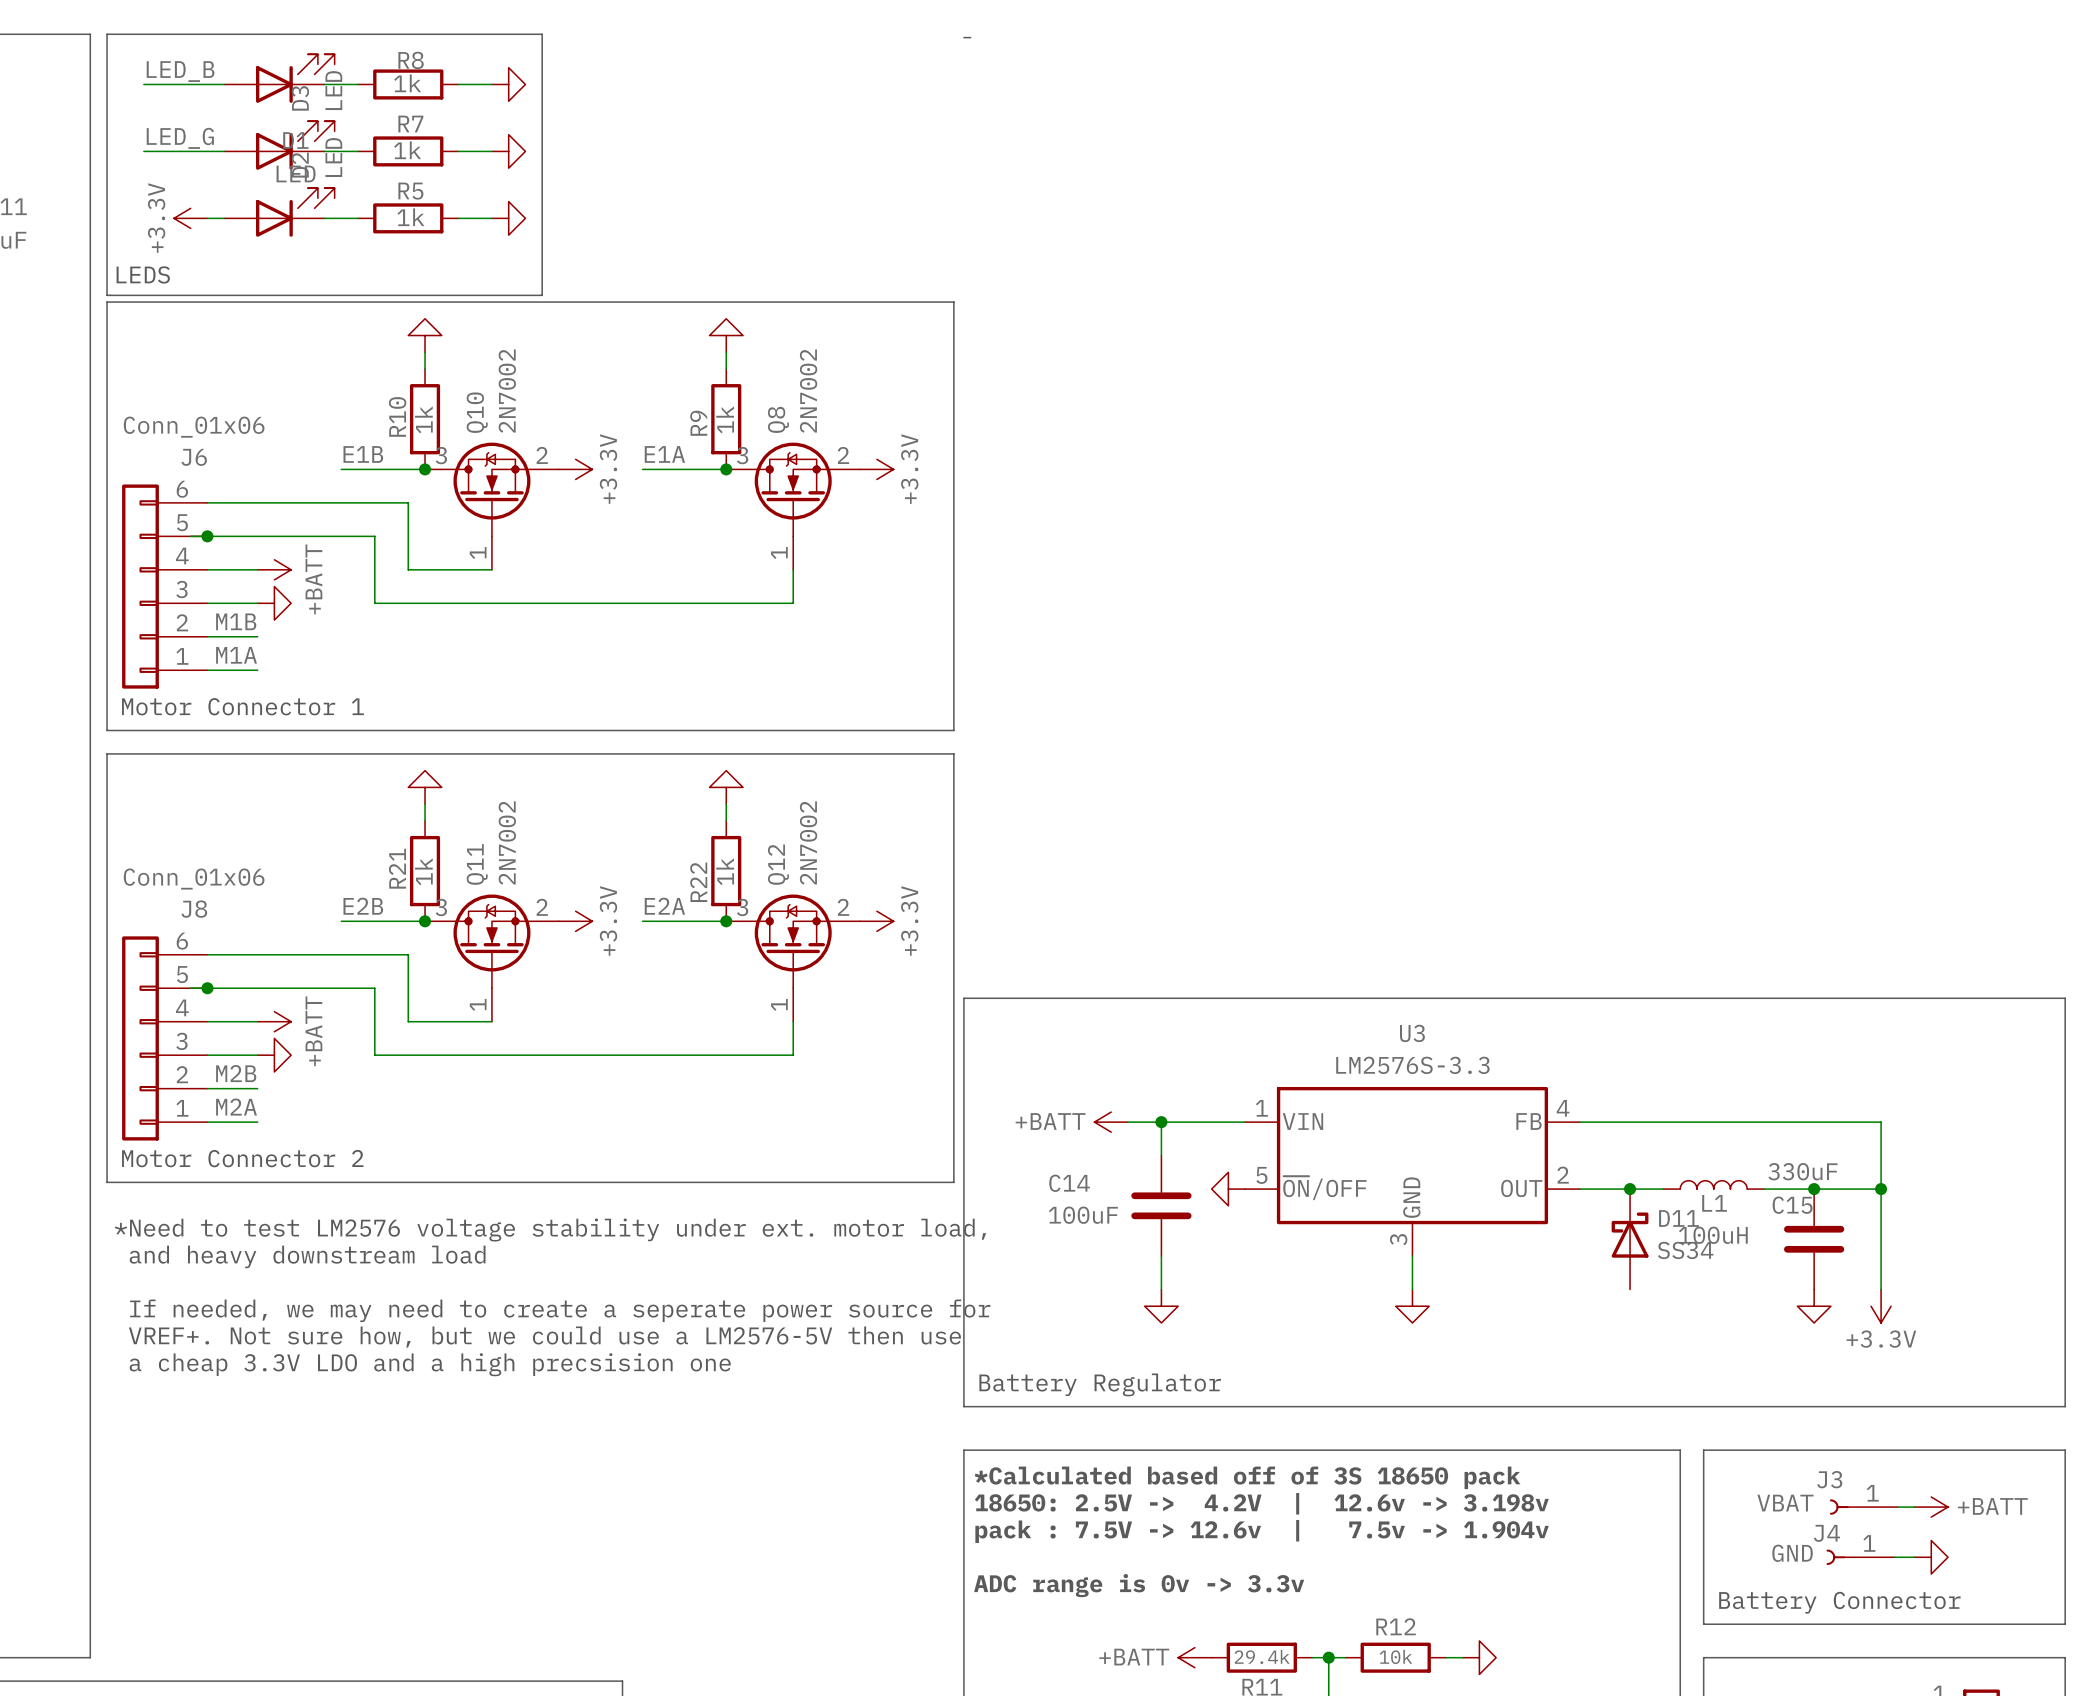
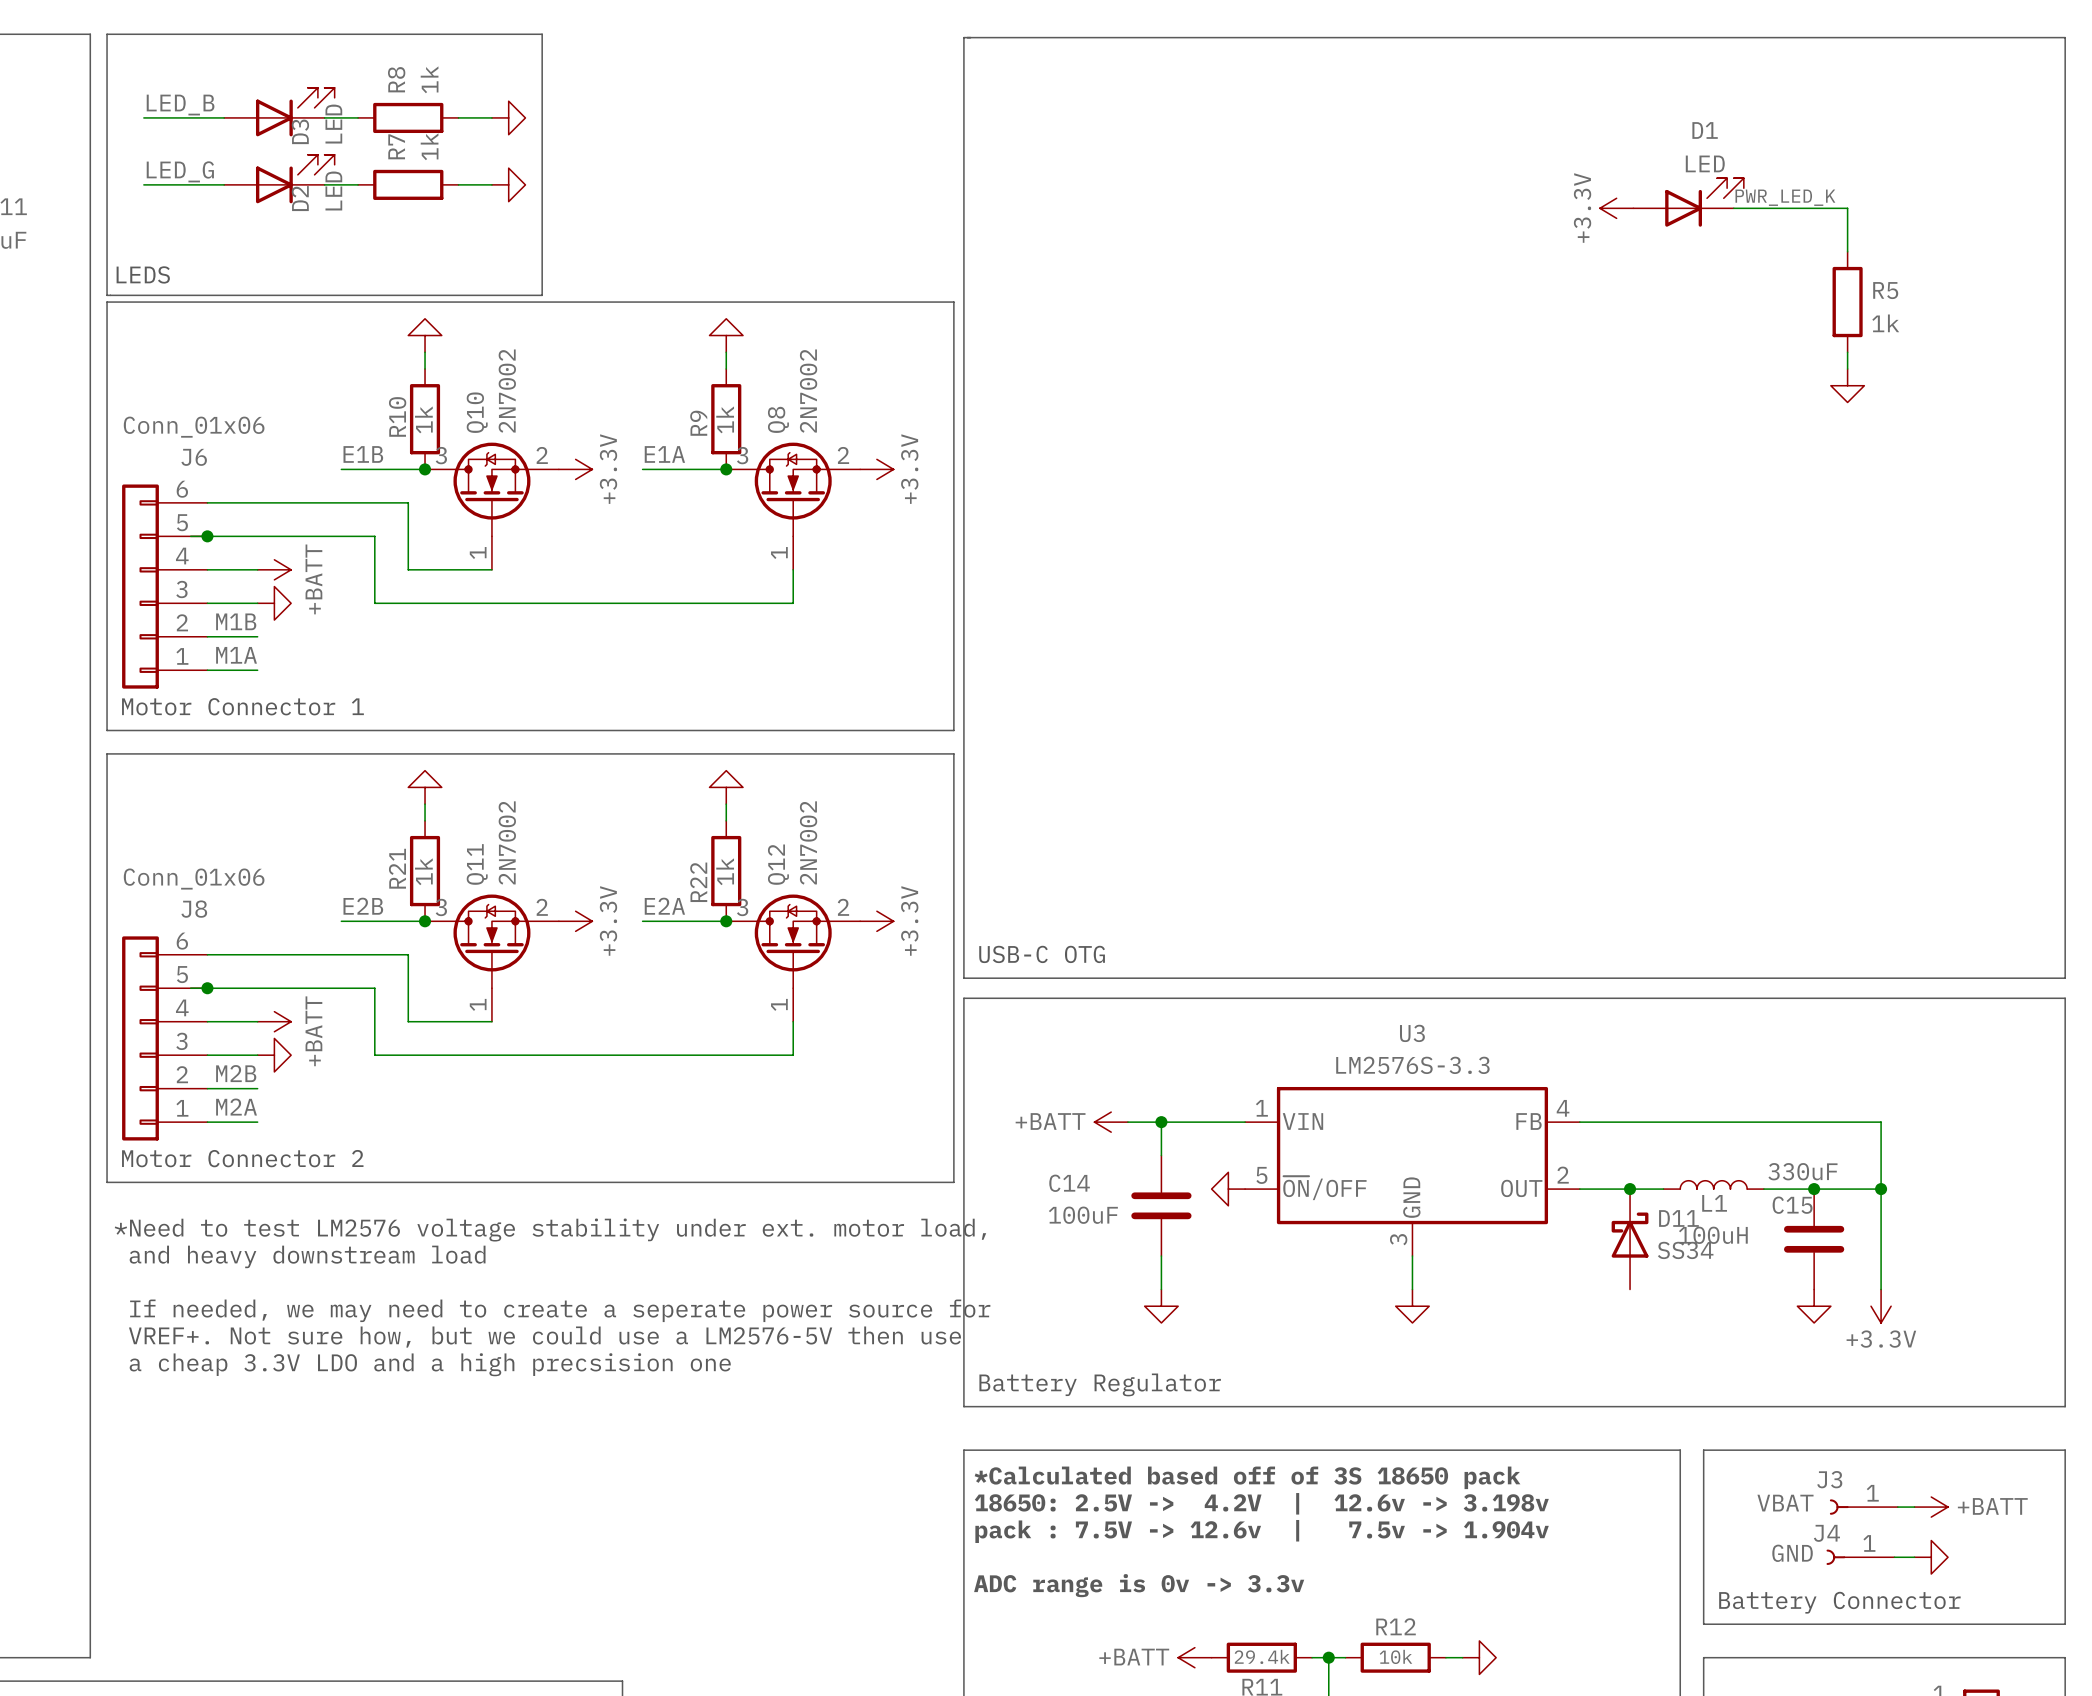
line: none -> (963, 37) (963, 978) (2065, 978) (2065, 37) (970, 37)
R8 name rotation: 0° (411, 60) -> 90° counterclockwise (396, 79)
label position: LED_B (180, 71) -> LED_B (180, 105)
D3 position: (279, 78) -> (279, 112)
R8 value rotation: 0° (407, 83) -> 90° counterclockwise (429, 79)
wire: (143, 84) (224, 84) -> (143, 117) (224, 117)
wire: (324, 84) (358, 84) -> (324, 117) (358, 117)
R8 position: (408, 84) -> (408, 117)
wire: (458, 84) (491, 84) -> (458, 117) (491, 117)
power symbol: (508, 84) -> none
power symbol: none -> (508, 117)
R7 name rotation: 0° (410, 124) -> 90° counterclockwise (396, 146)
label position: LED_G (180, 138) -> LED_G (180, 171)
D2 position: (279, 145) -> (279, 179)
R7 value rotation: 0° (407, 150) -> 90° counterclockwise (429, 146)
wire: (143, 151) (224, 151) -> (143, 184) (224, 184)
wire: (324, 151) (358, 151) -> (324, 184) (358, 184)
R7 position: (408, 151) -> (408, 184)
wire: (458, 151) (491, 151) -> (458, 184) (491, 184)
power symbol: (508, 151) -> none
power symbol: none -> (508, 184)
label: none -> PWR_LED_K (1785, 197)
power symbol: none -> +3.3V (1616, 208)
wire: none -> (1733, 208) (1847, 208) (1847, 251)
D1 position: (279, 212) -> (1688, 202)
R5 value position: 1k (410, 217) -> 1k (1885, 323)
power symbol: +3.3V (190, 218) -> none
wire: (207, 218) (224, 218) -> none
wire: (324, 218) (358, 218) -> none
R5 rotation: 0° (408, 218) -> 90° clockwise (1847, 302)
R5 position: (408, 218) -> (1847, 302)
wire: (458, 218) (491, 218) -> none
power symbol: (508, 218) -> none
wire: none -> (1847, 352) (1847, 368)
power symbol: none -> (1847, 385)
text: none -> USB-C OTG (1042, 954)

